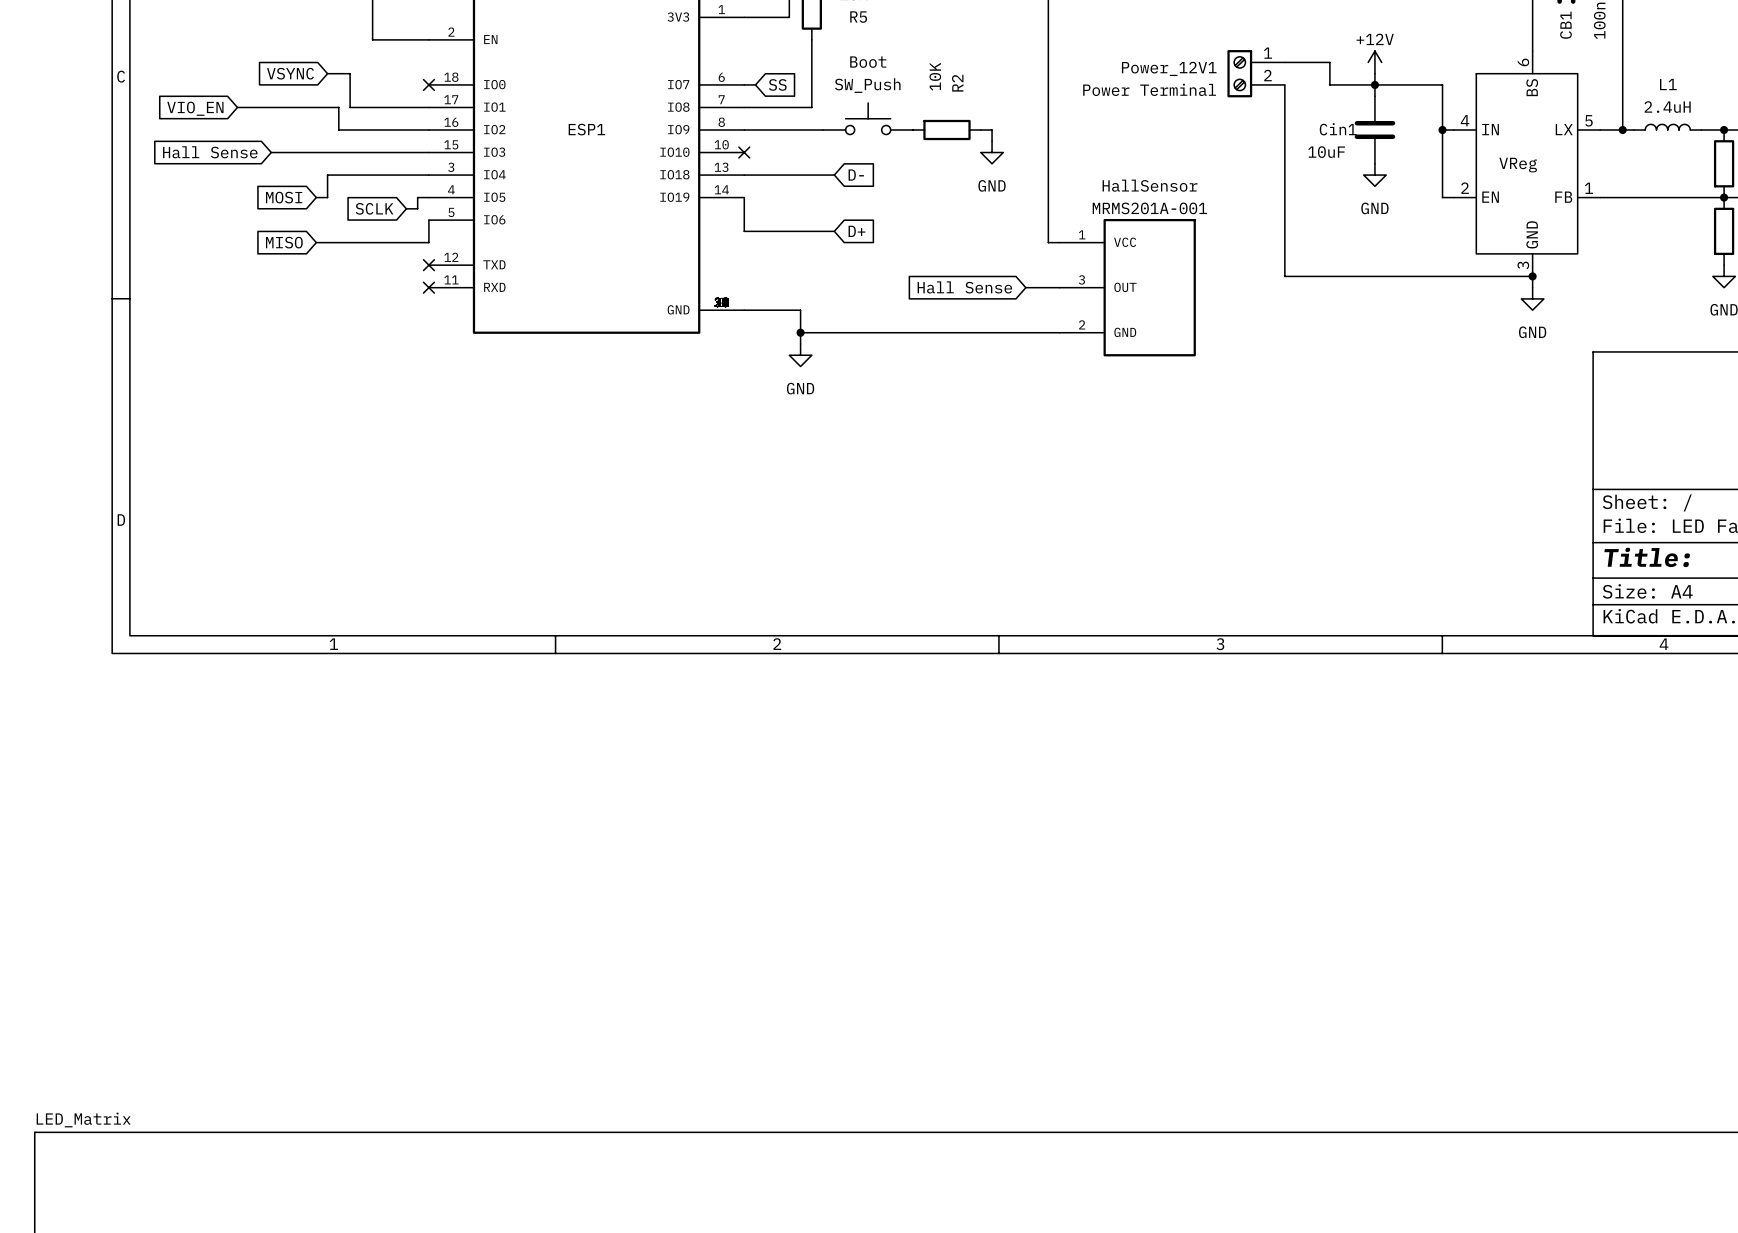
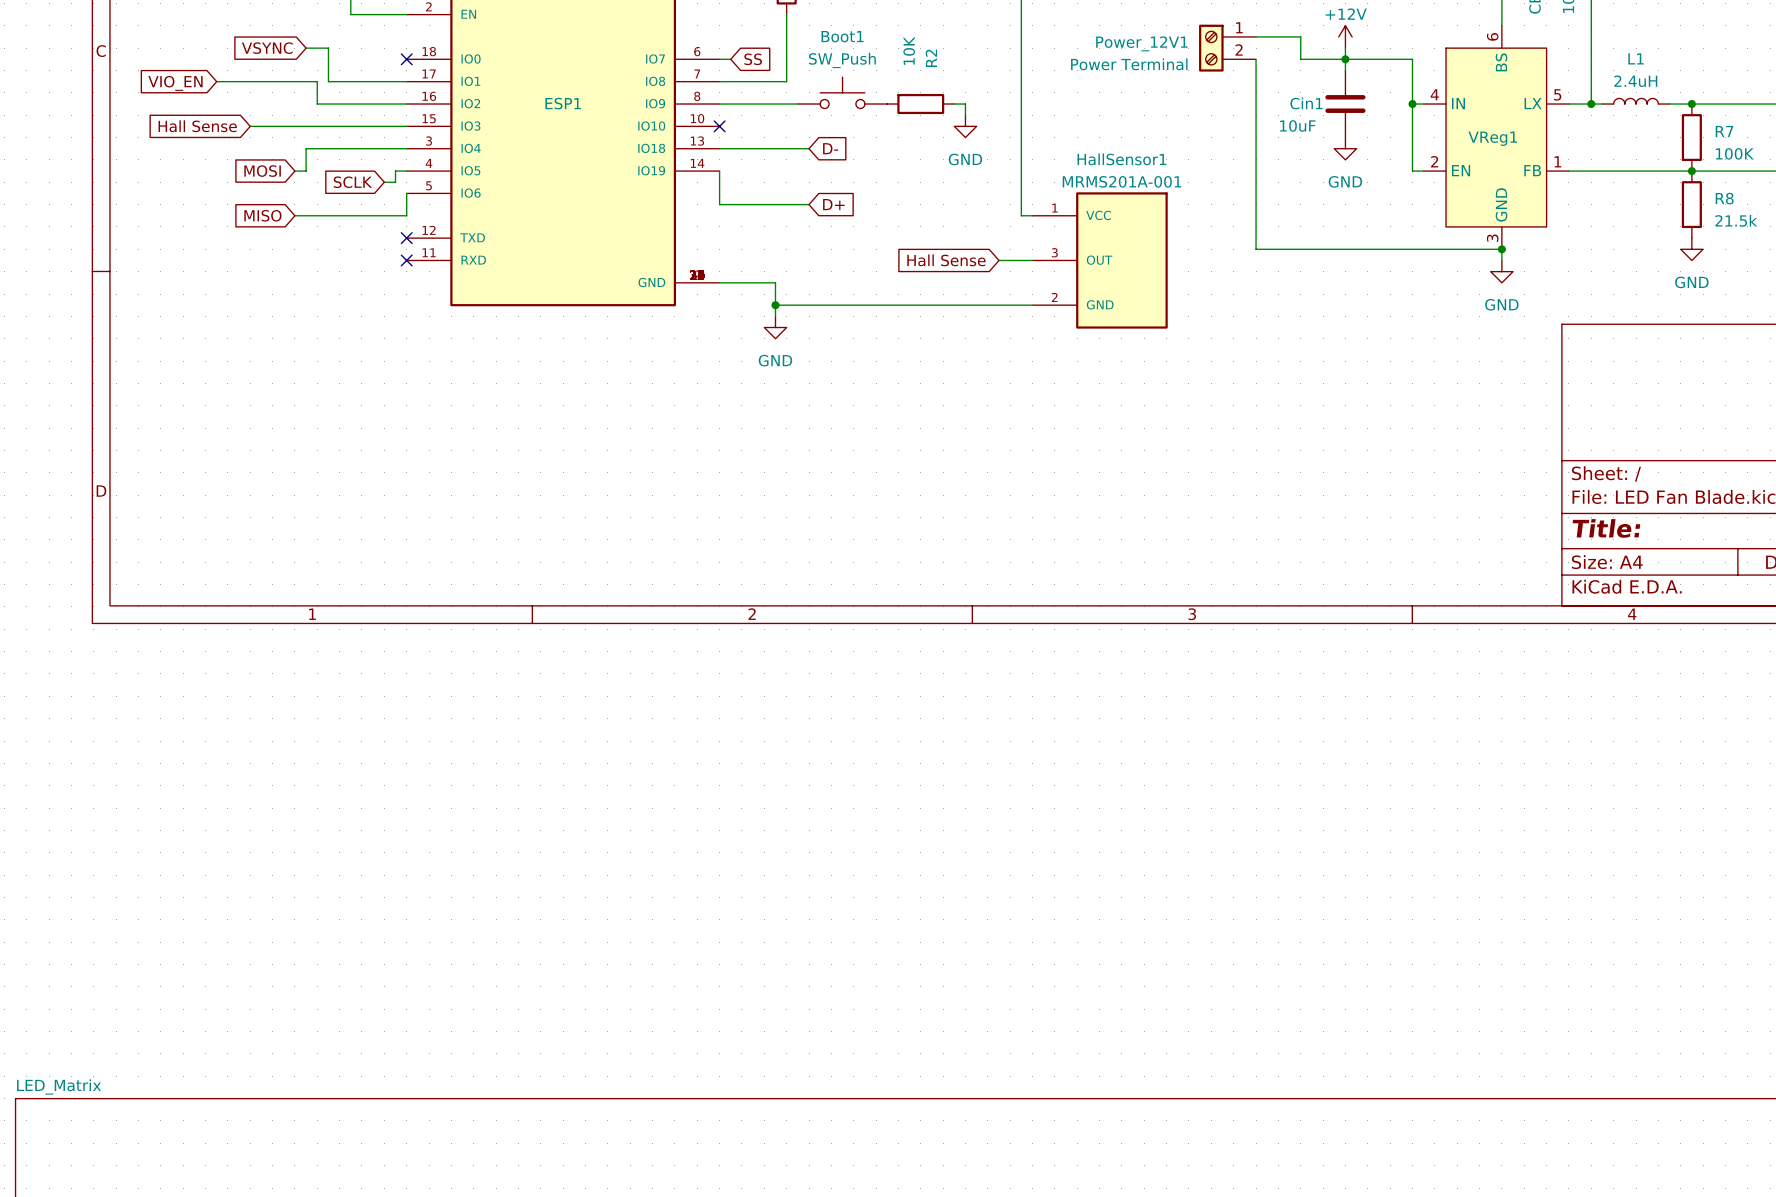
Boot name: Boot (868, 62) -> Boot1 (842, 36)
VReg name: VReg (1518, 165) -> VReg1 (1492, 138)
HallSensor name: HallSensor (1150, 185) -> HallSensor1 (1121, 159)

